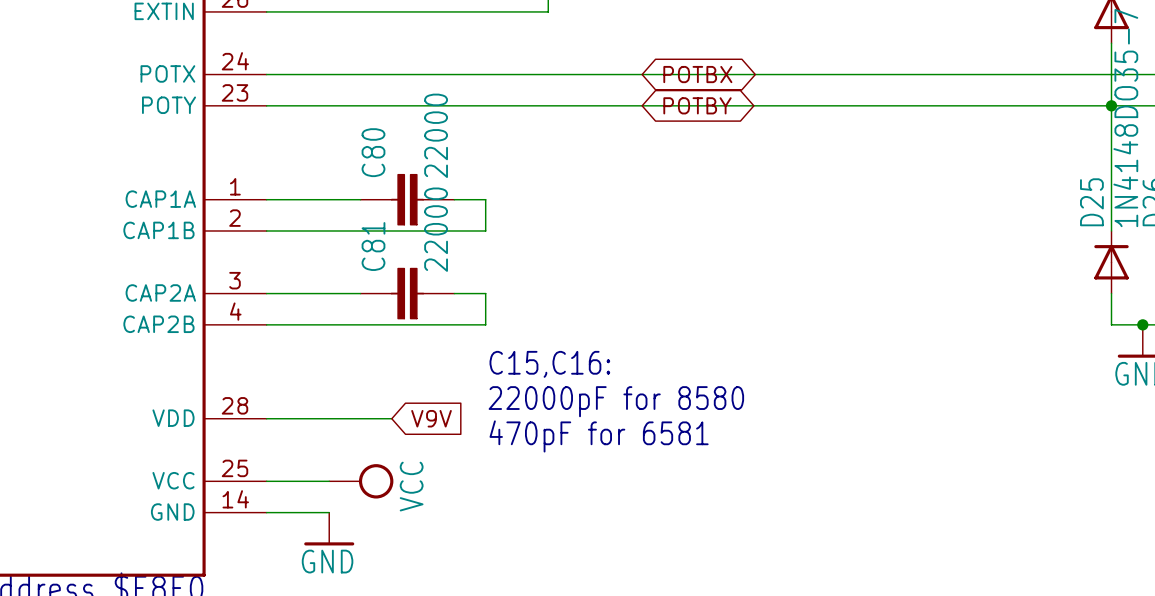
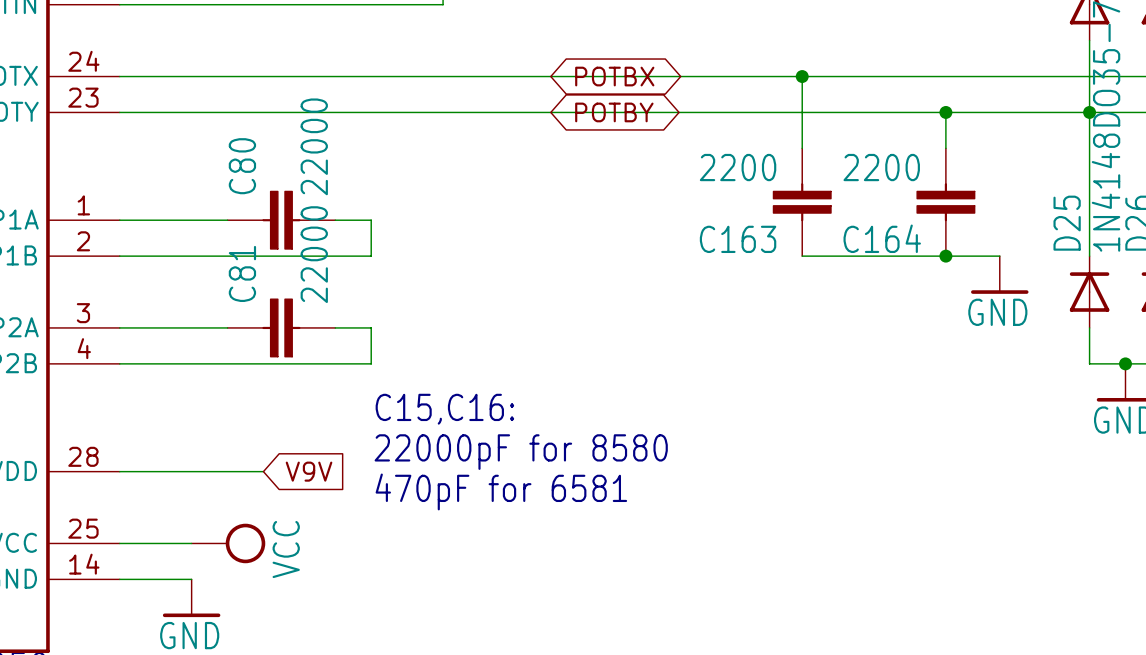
wire: none -> (802, 76) (802, 148)
junction: none -> (802, 76)
wire: none -> (945, 112) (945, 148)
junction: none -> (945, 112)
C163: none -> 2200 (802, 202)
C164: none -> 2200 (945, 202)
wire: none -> (802, 256) (999, 256)
junction: none -> (945, 256)
power symbol: none -> GND (999, 274)

